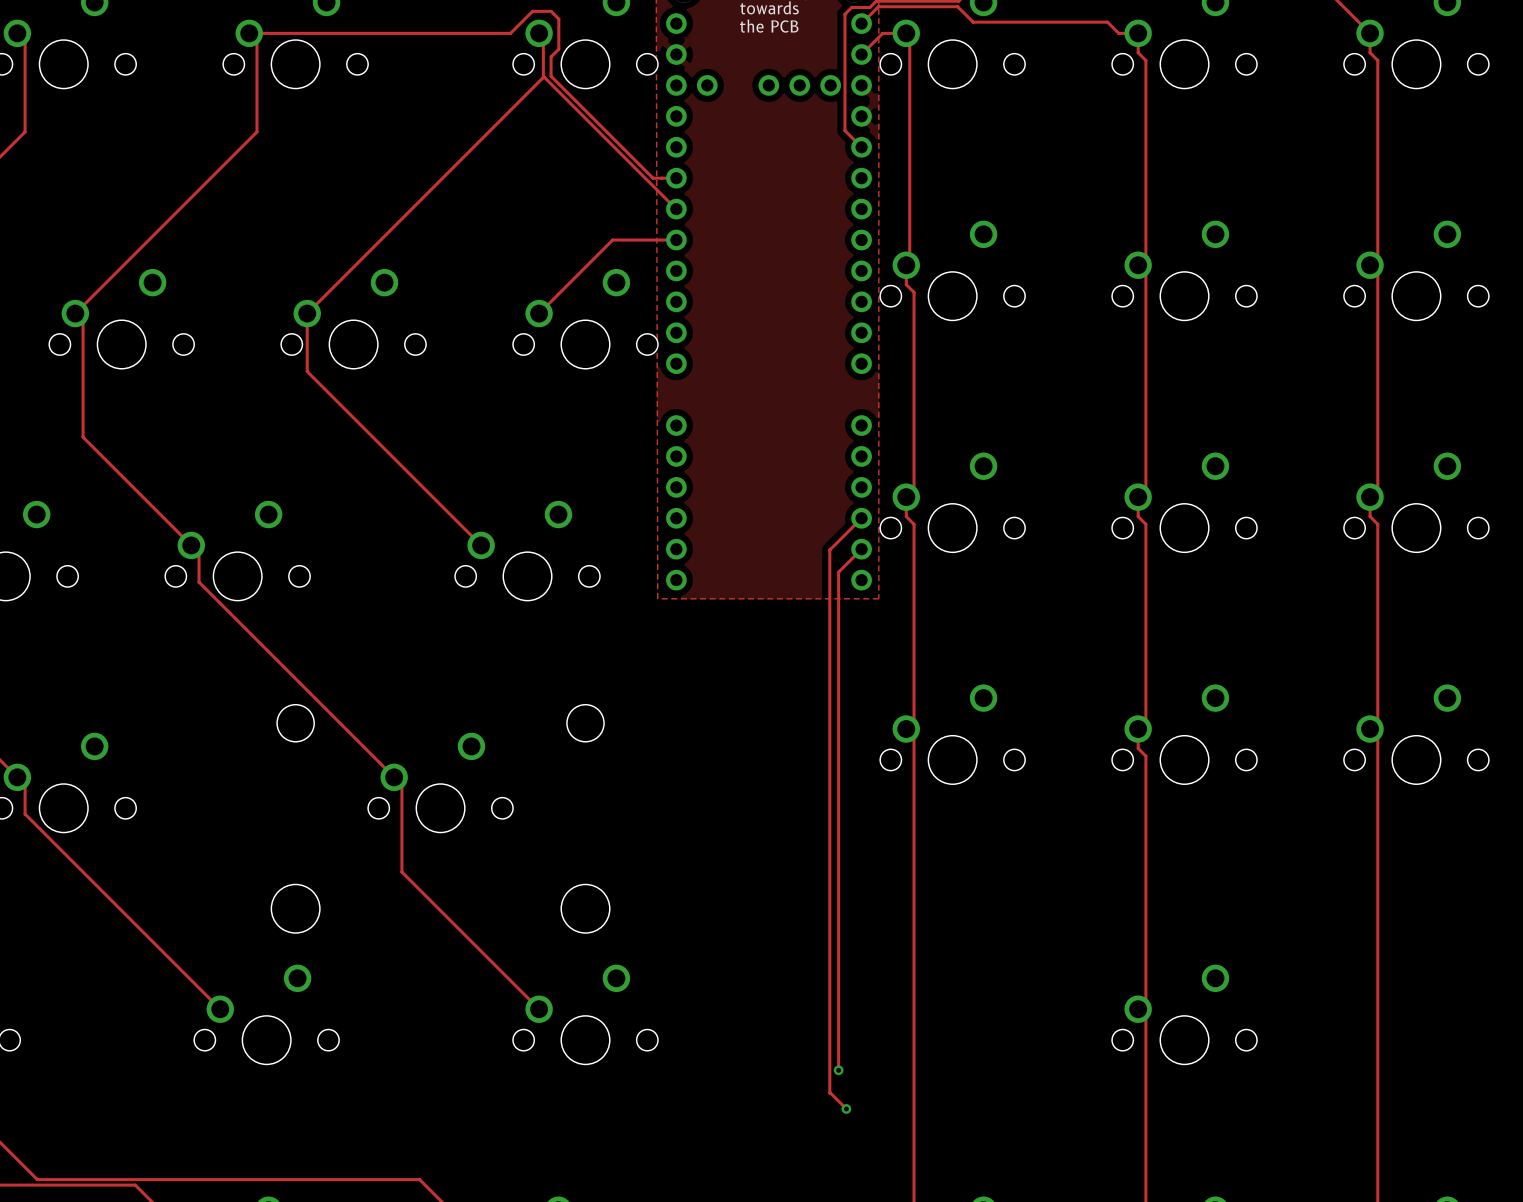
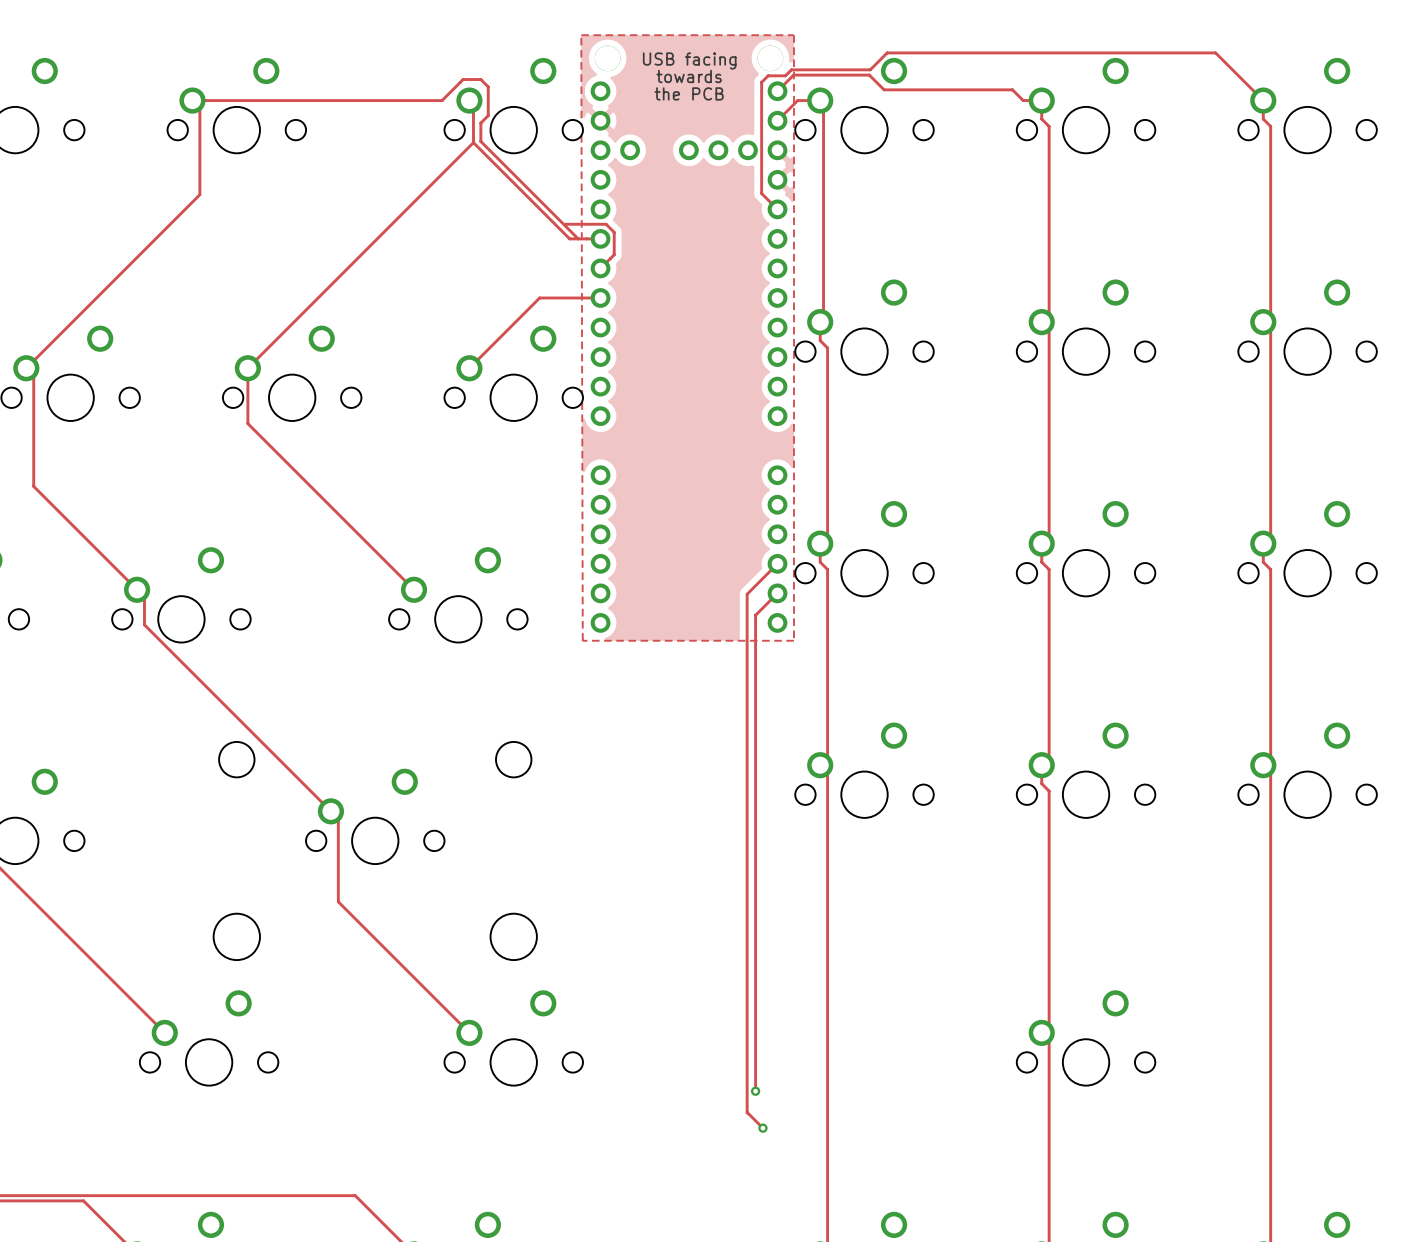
track: (543, 77) (676, 209) -> (473, 142) (569, 238) (578, 238)
track: none -> (566, 224) (606, 224) (614, 232) (614, 254) (600, 268)

